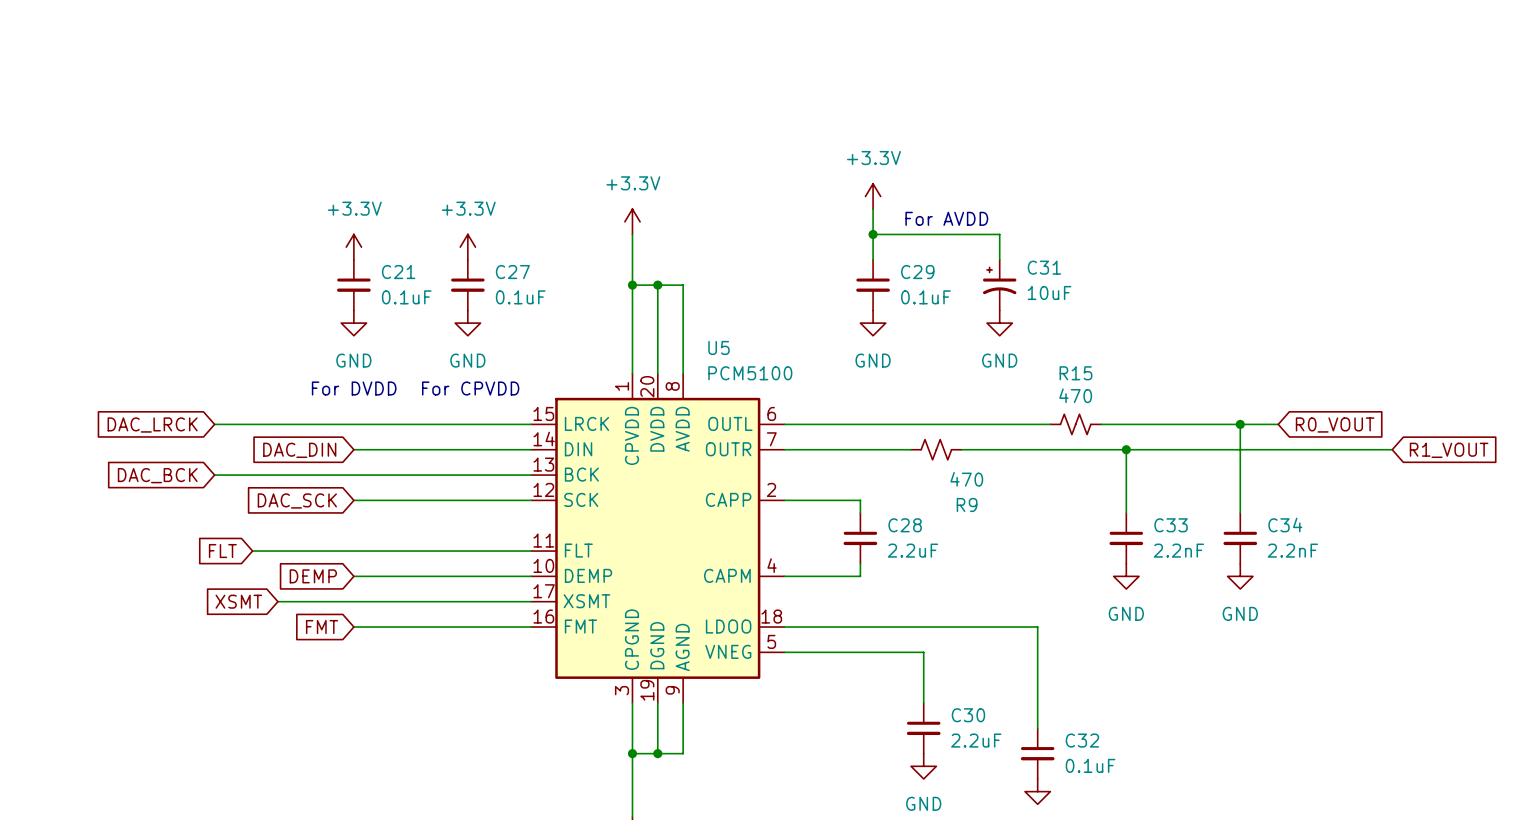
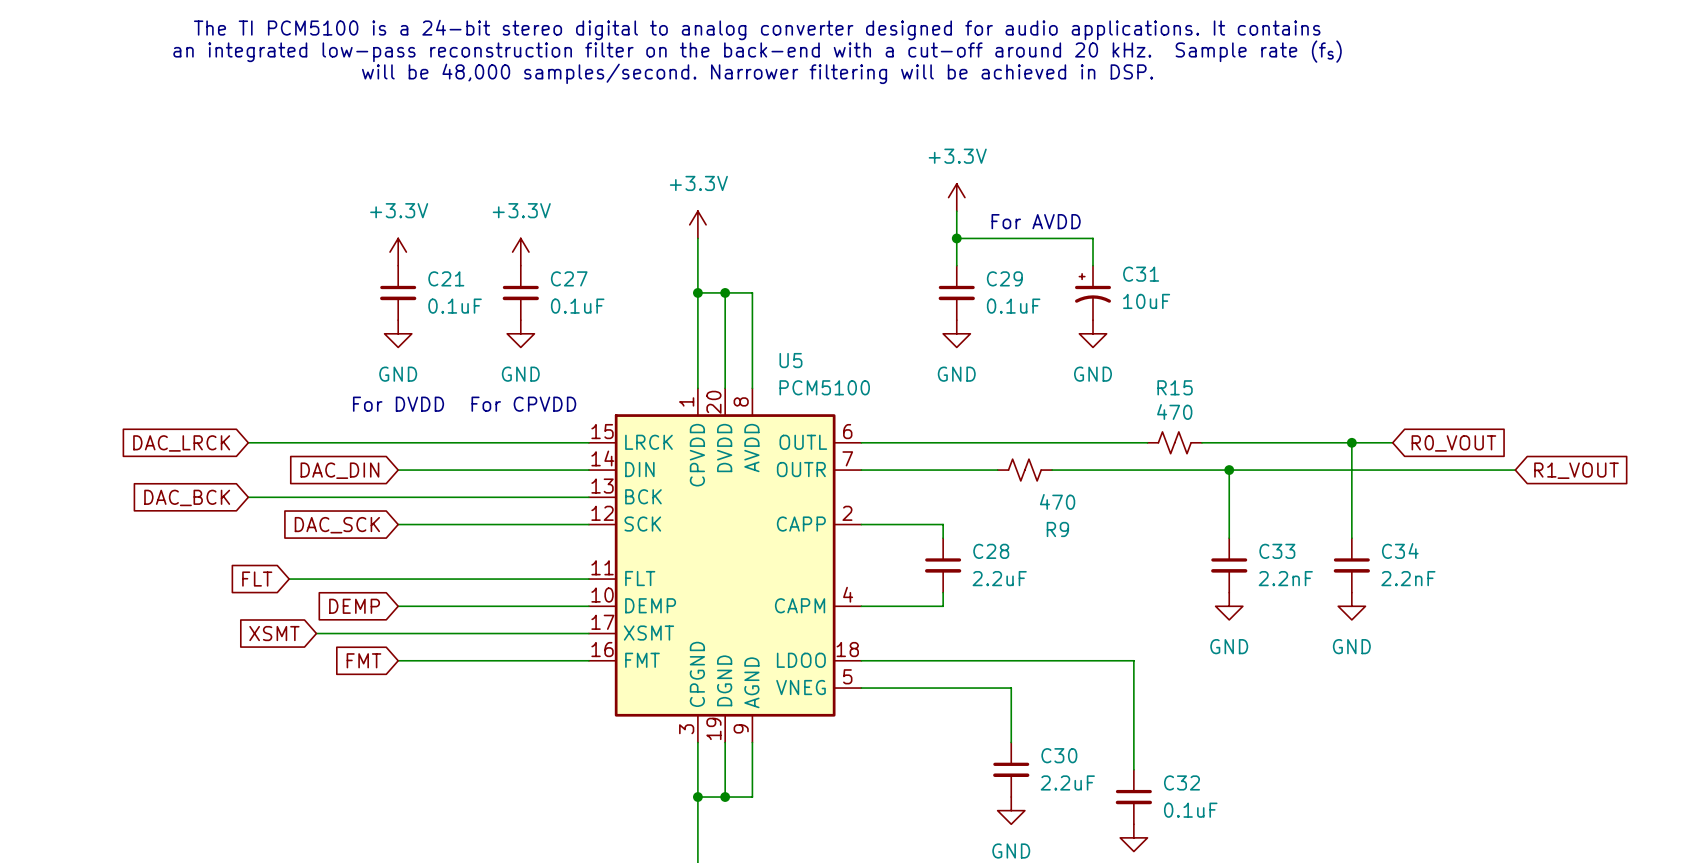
text: none -> The TI PCM5100 is a 24-bit stereo digital to analog converter designed for audio applications. It contains (757, 29)
text: none -> an integrated low-pass reconstruction filter on the back-end with a cut-off around 20 kHz. Sample rate (fs) (757, 51)
text: none -> will be 48,000 samples/second. Narrower filtering will be achieved in DSP. (757, 73)

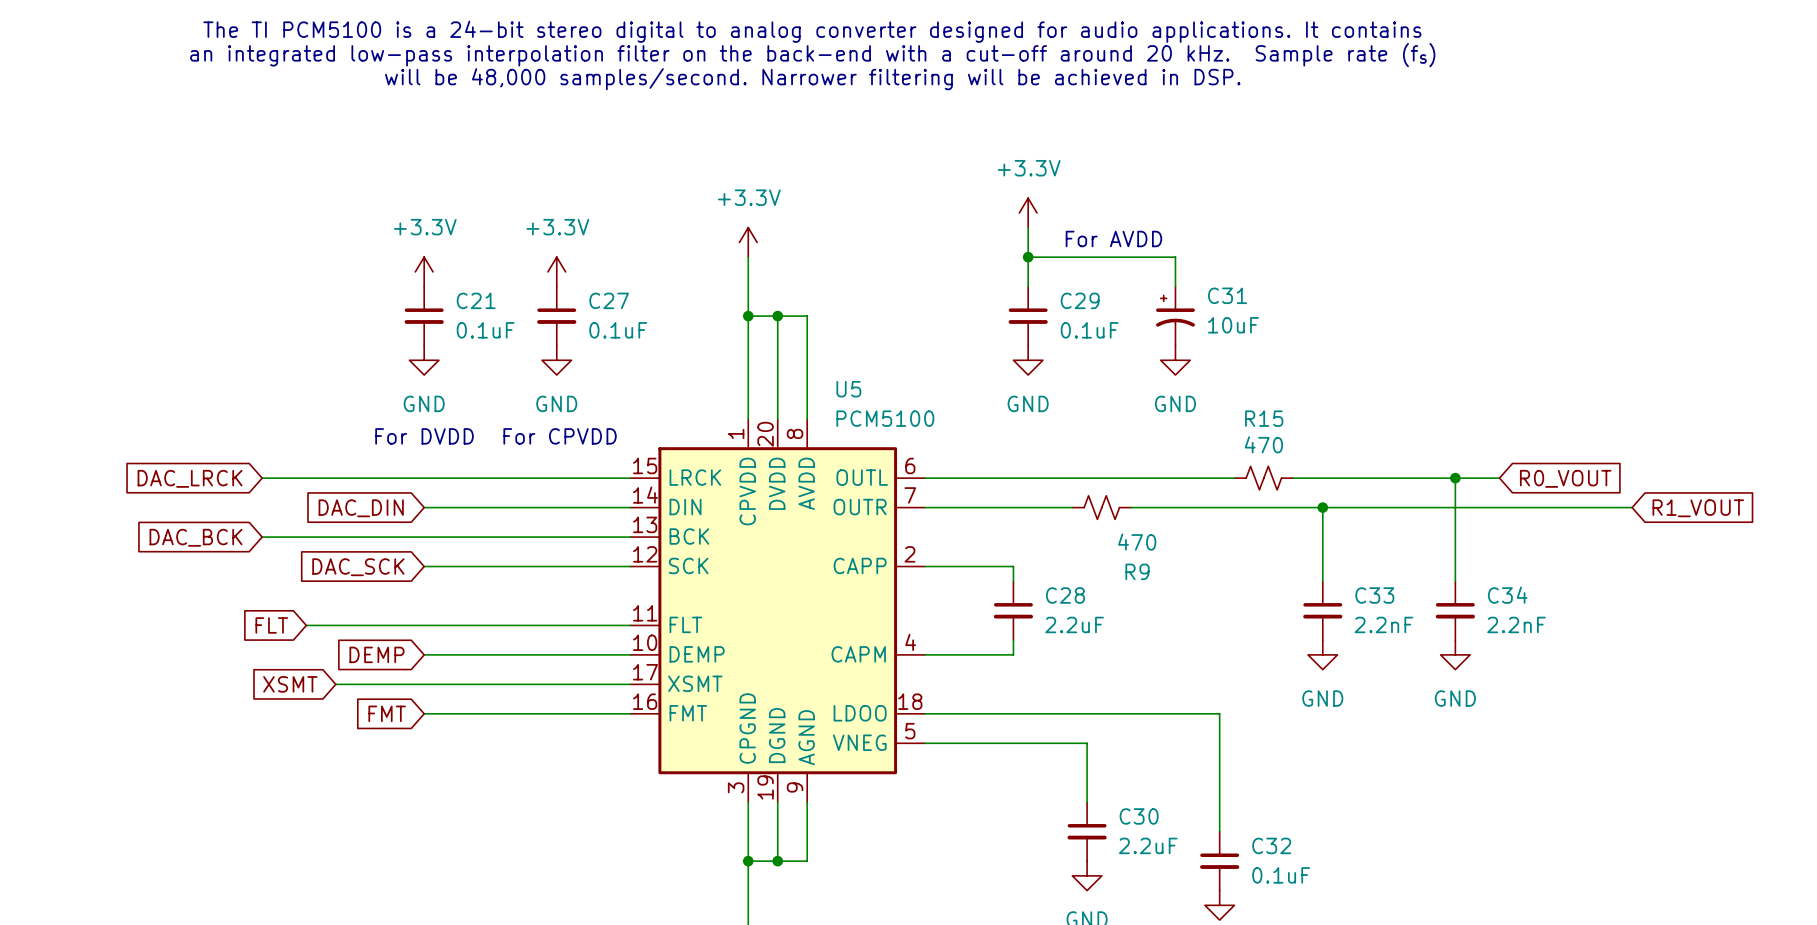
text: an integrated low-pass reconstruction filter on the back-end with a cut-off around 20 kHz. Sample rate (fs) (757, 51) -> an integrated low-pass interpolation filter on the back-end with a cut-off around 20 kHz. Sample rate (fs) (812, 55)

